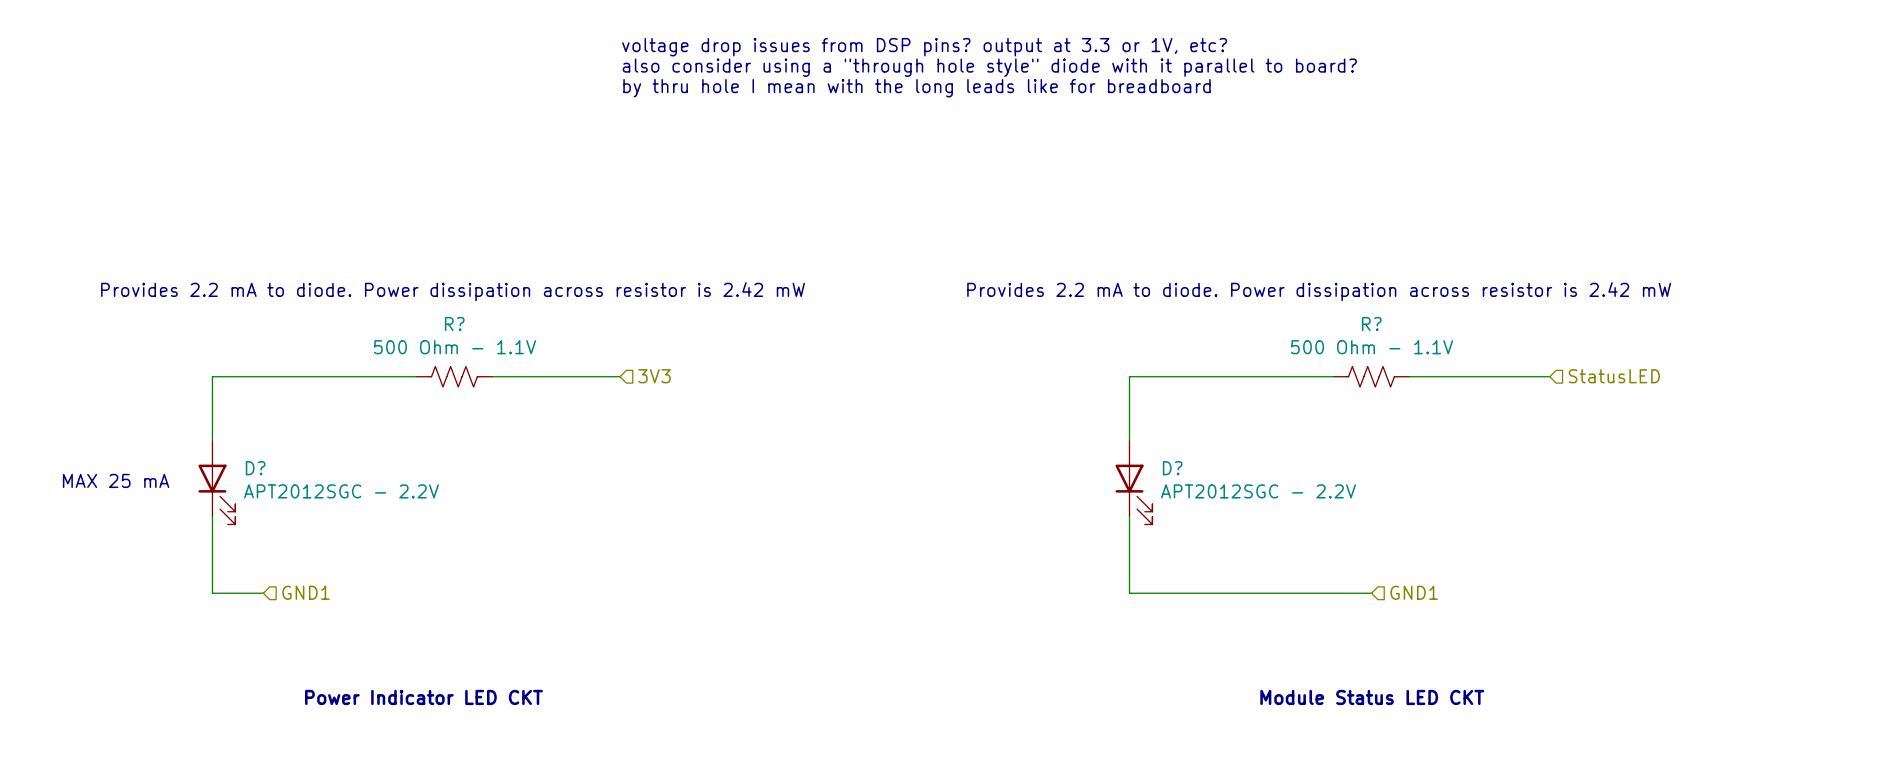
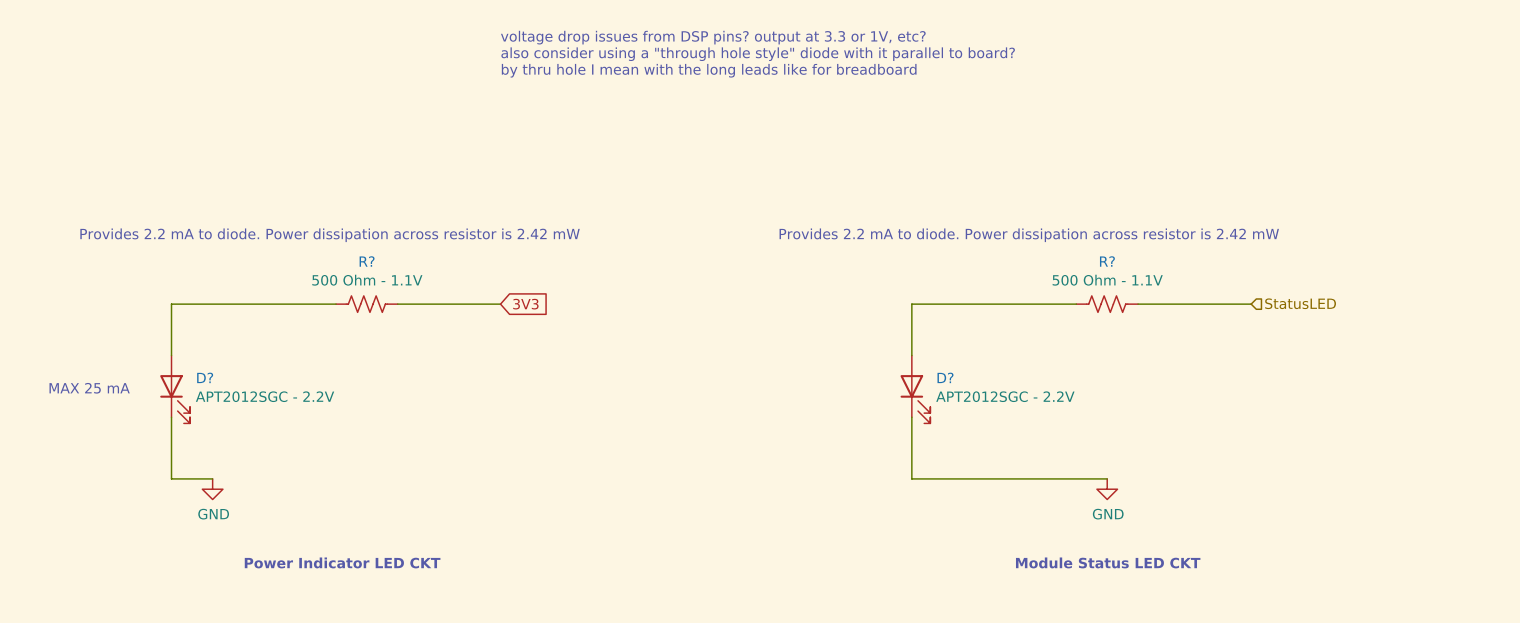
global label: none -> 3V3 (525, 304)
hierarchical label: 3V3 (654, 376) -> none
hierarchical label: GND1 (306, 592) -> none
hierarchical label: GND1 (1414, 592) -> none
power symbol: none -> GND (212, 489)
power symbol: none -> GND (1107, 489)

